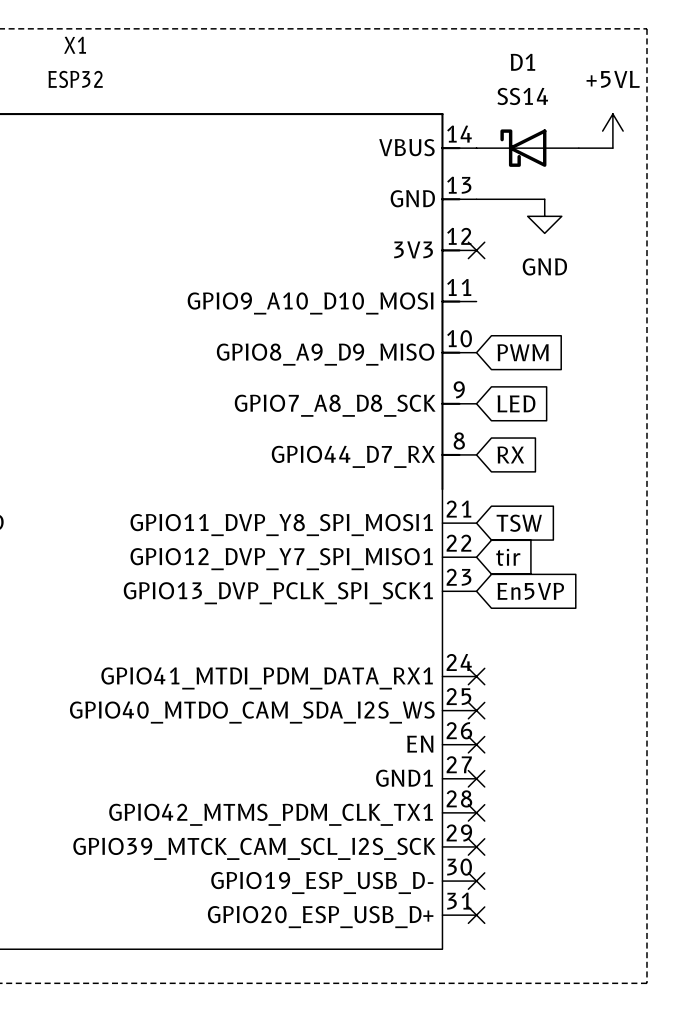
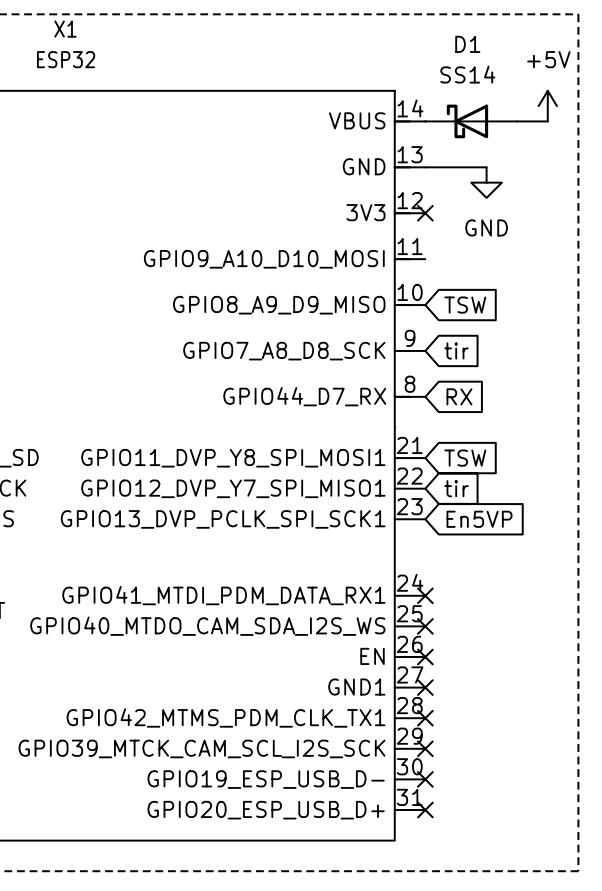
power symbol: +5VL (612, 131) -> +5V (547, 106)
global label: PWM (523, 352) -> TSW (465, 305)
global label: LED (516, 403) -> tir (456, 350)

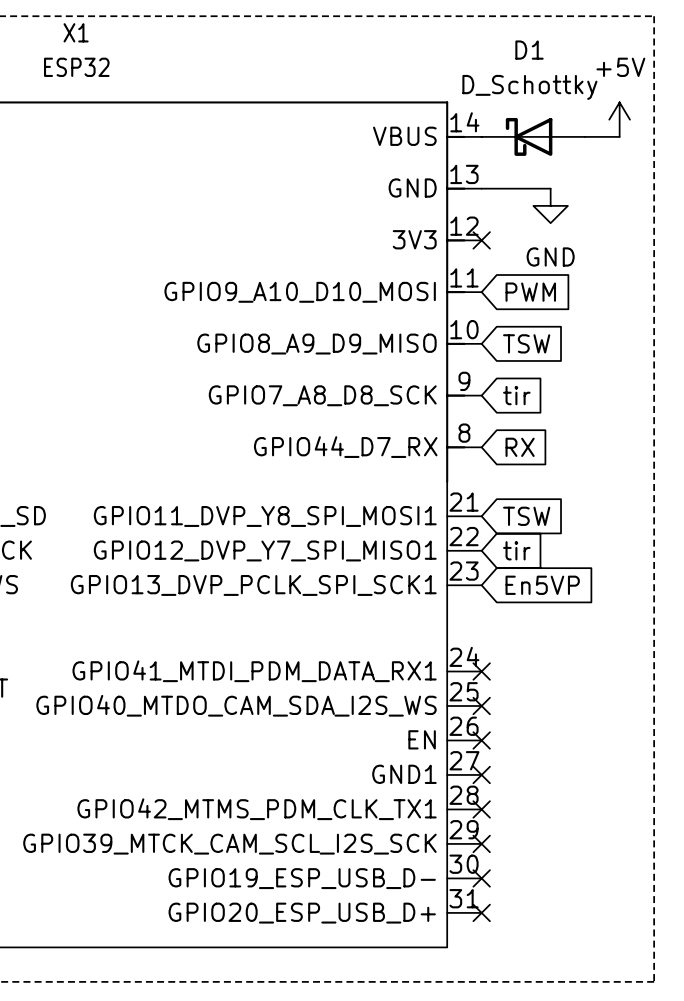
D1 value: SS14 (467, 74) -> D_Schottky (529, 87)
global label: none -> PWM (530, 292)

